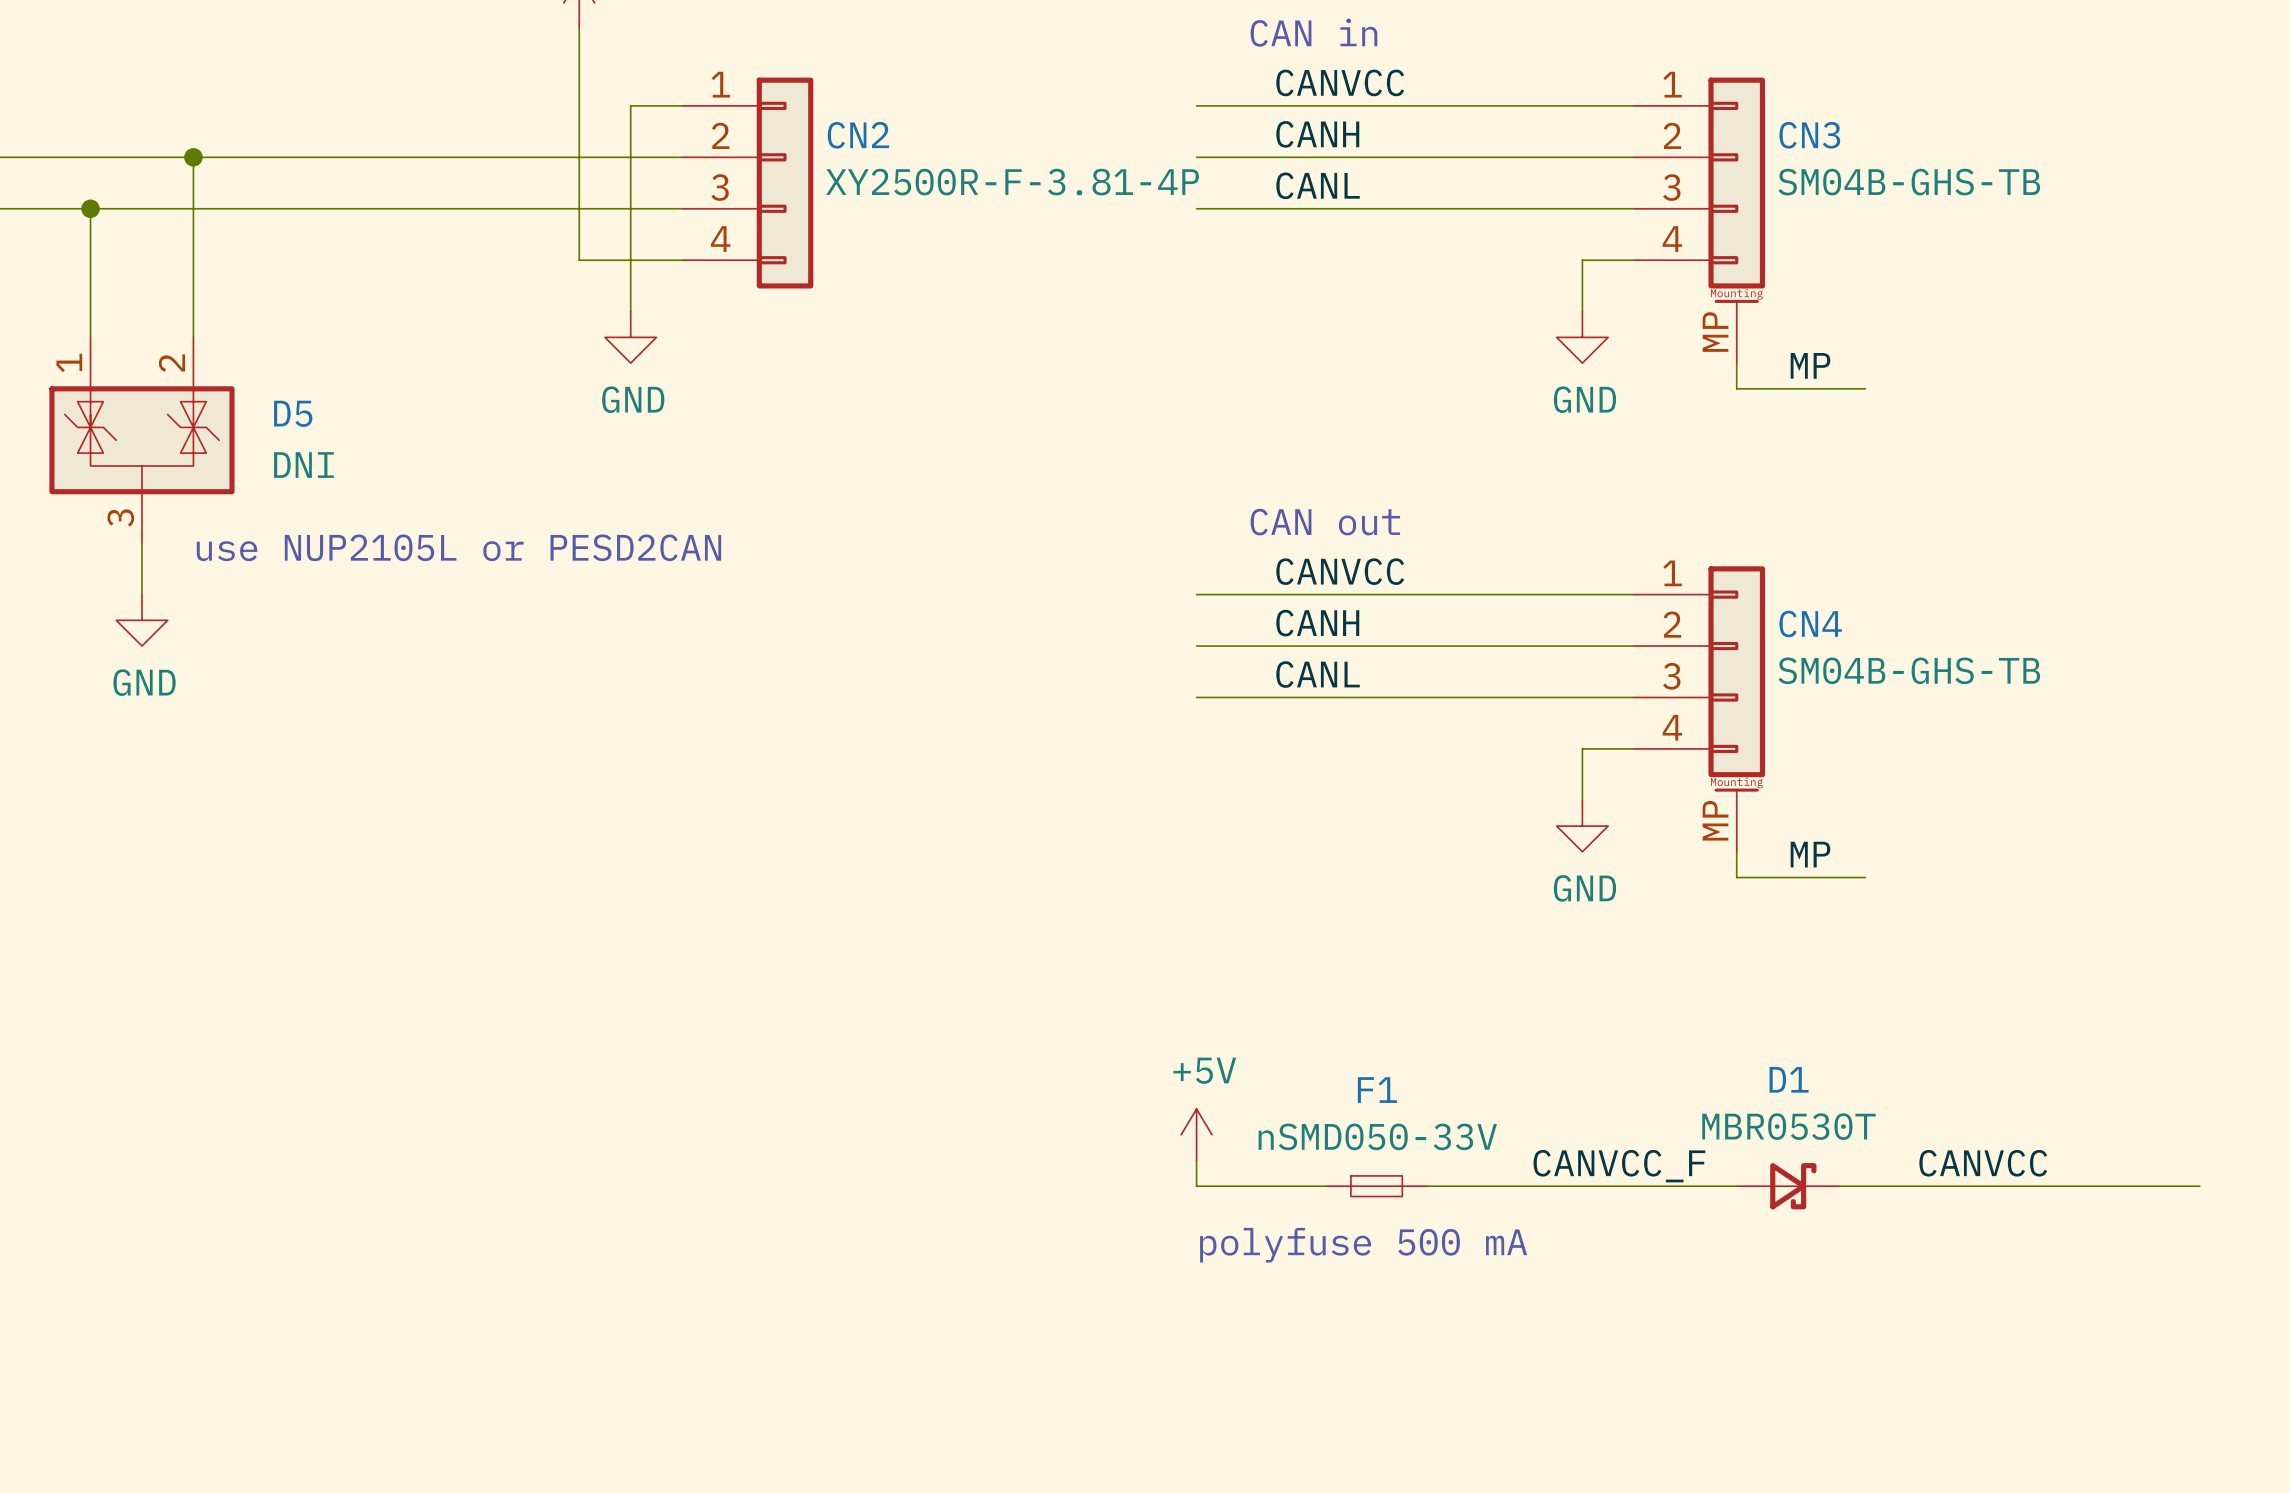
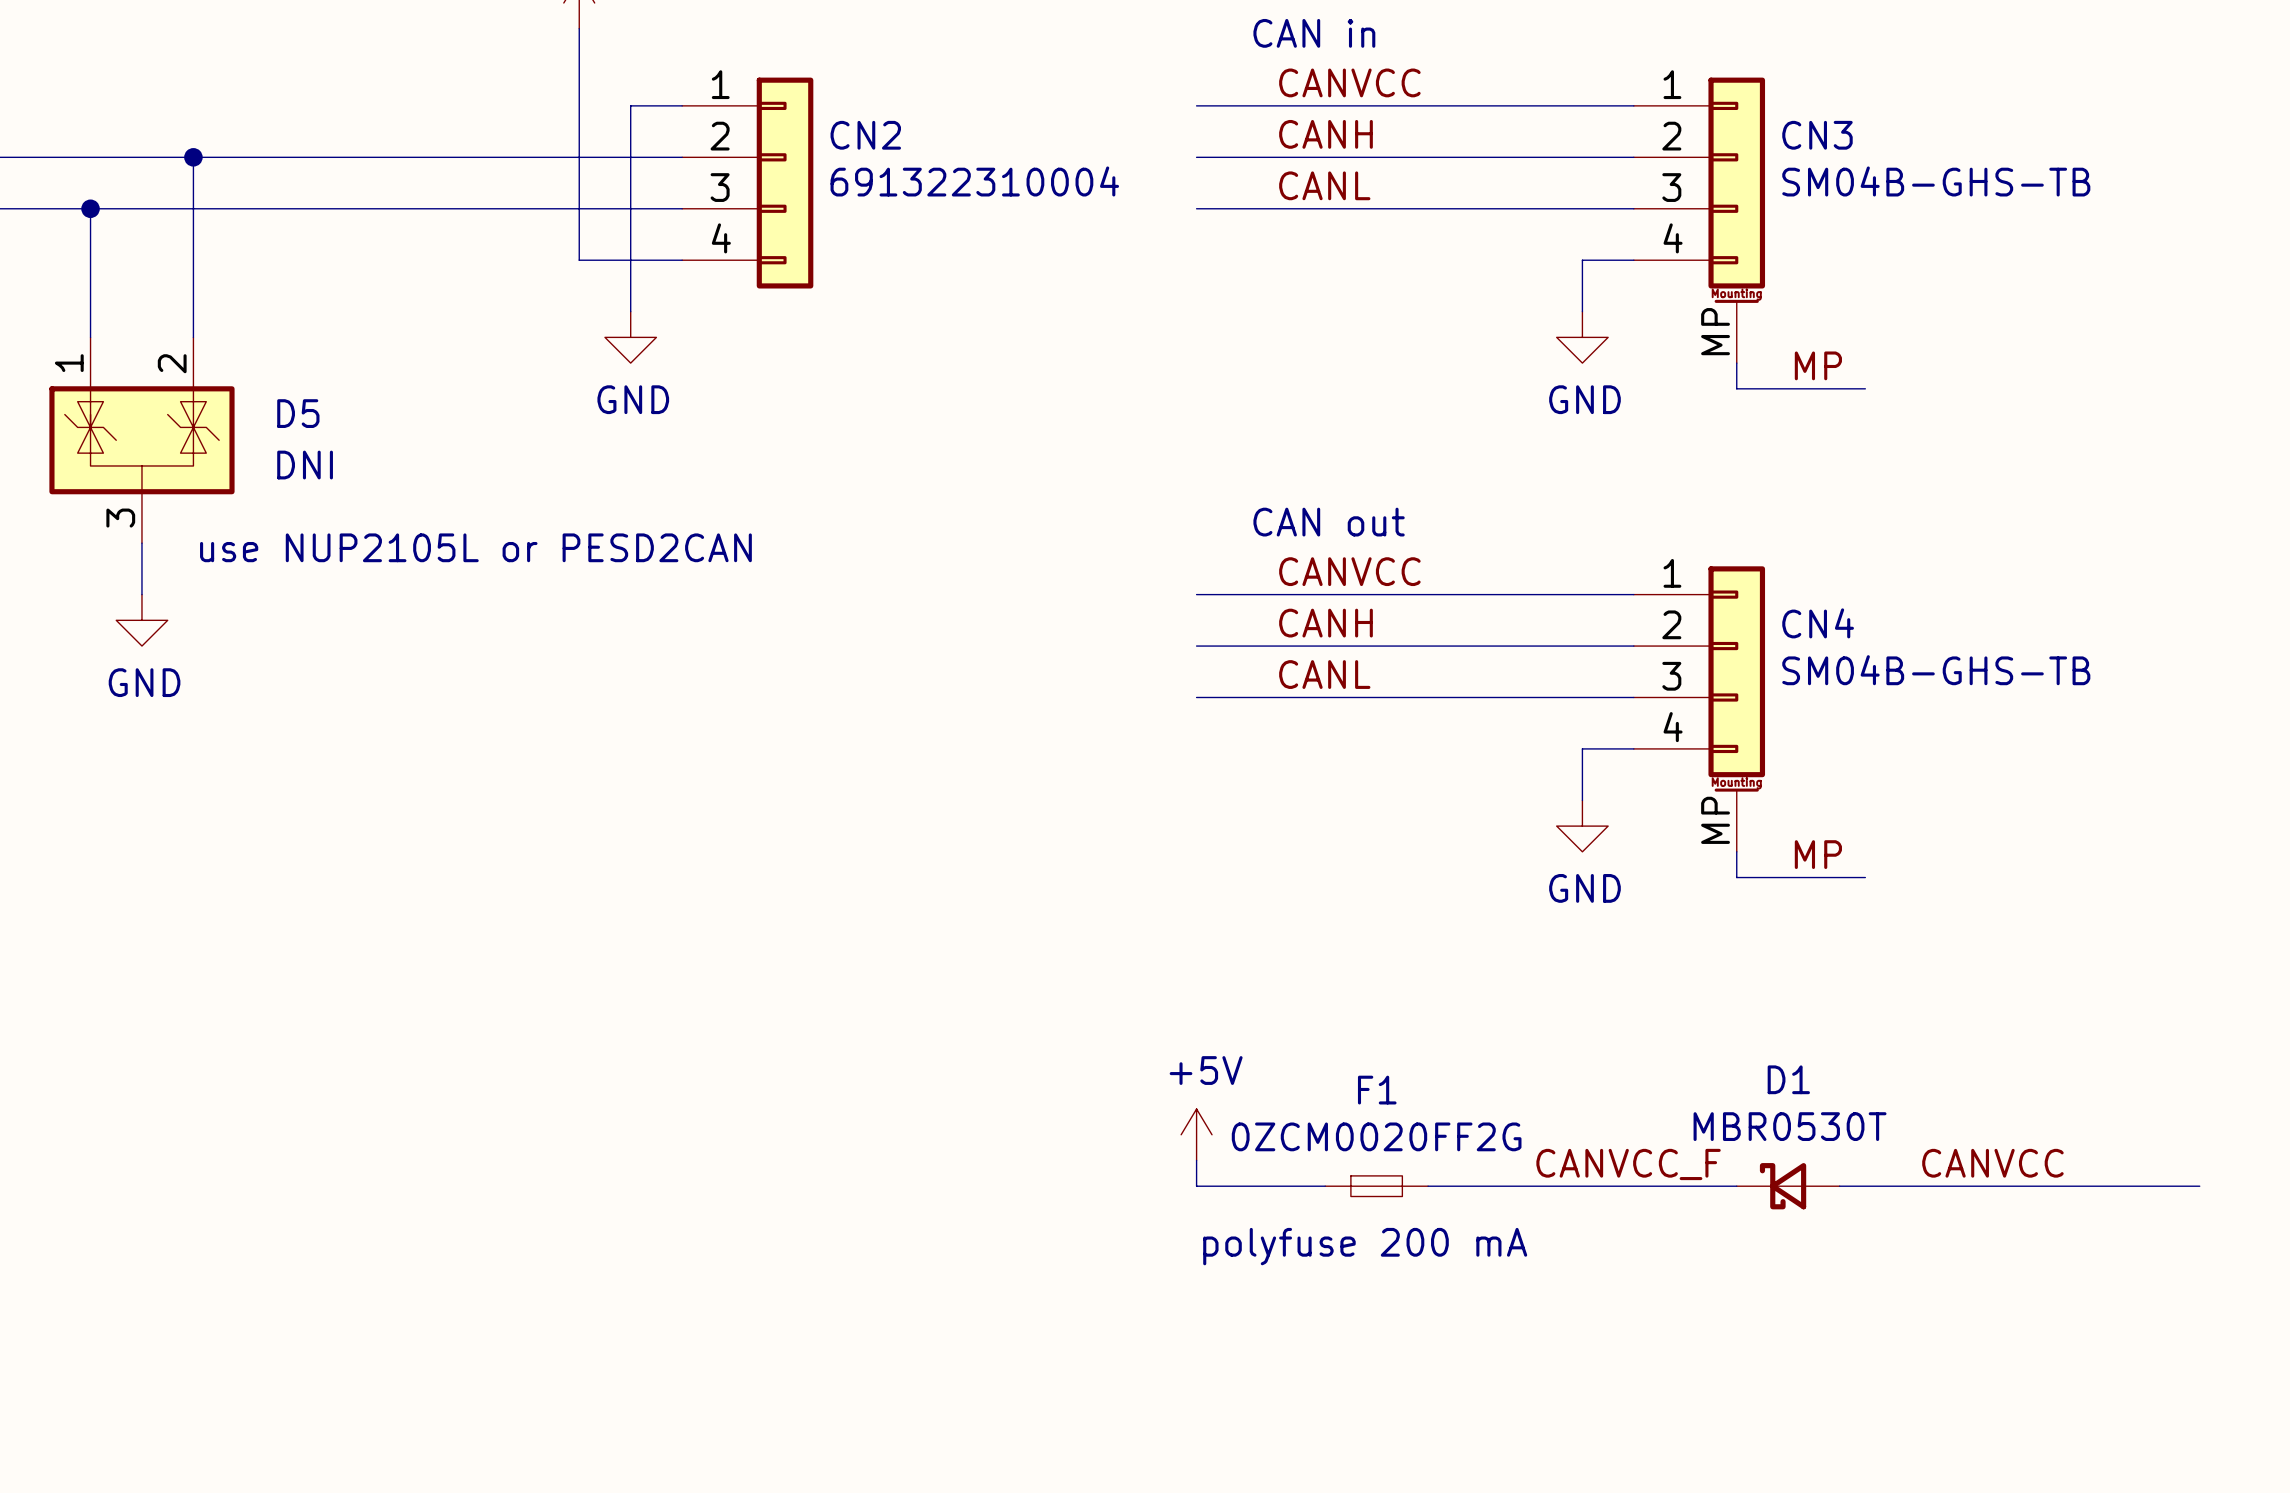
CN2 value: XY2500R-F-3.81-4P (1012, 182) -> 691322310004 (974, 181)
F1 value: nSMD050-33V (1377, 1136) -> 0ZCM0020FF2G (1376, 1136)
D1 flip: as is (1793, 1186) -> left-right (1783, 1186)
text: polyfuse 500 mA (1363, 1245) -> polyfuse 200 mA (1365, 1246)

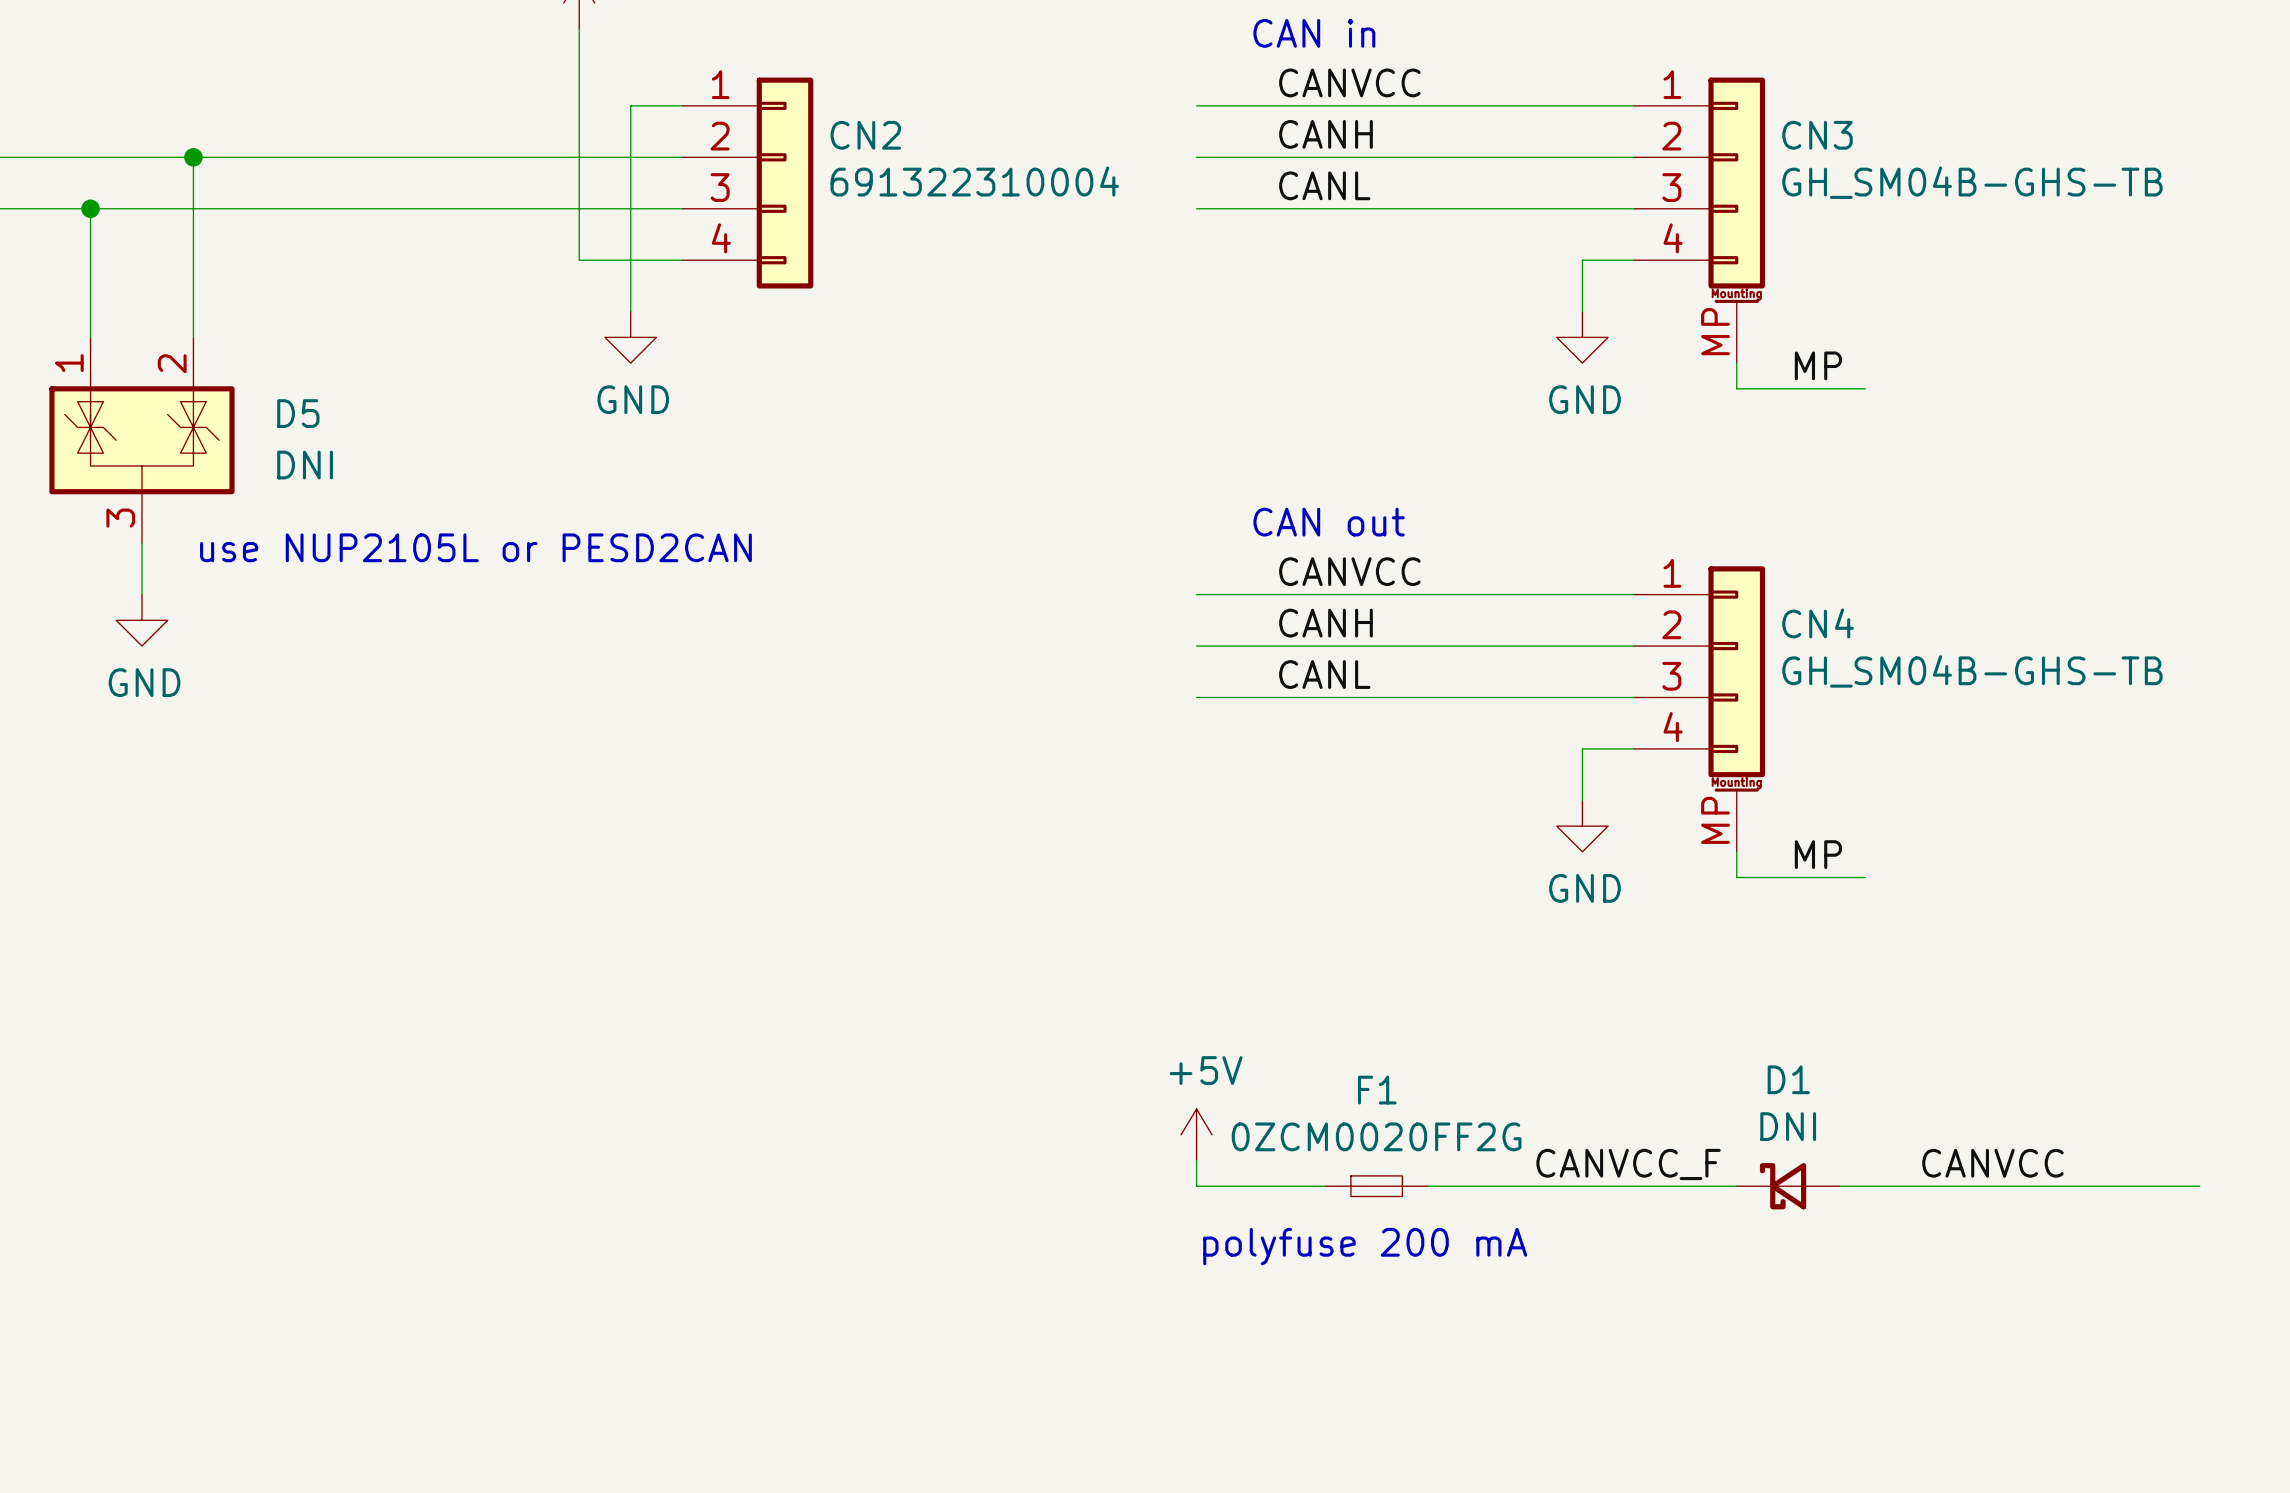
CN3 value: SM04B-GHS-TB (1936, 181) -> GH_SM04B-GHS-TB (1972, 182)
CN4 value: SM04B-GHS-TB (1936, 670) -> GH_SM04B-GHS-TB (1972, 671)
D1 value: MBR0530T (1790, 1126) -> DNI (1788, 1126)

